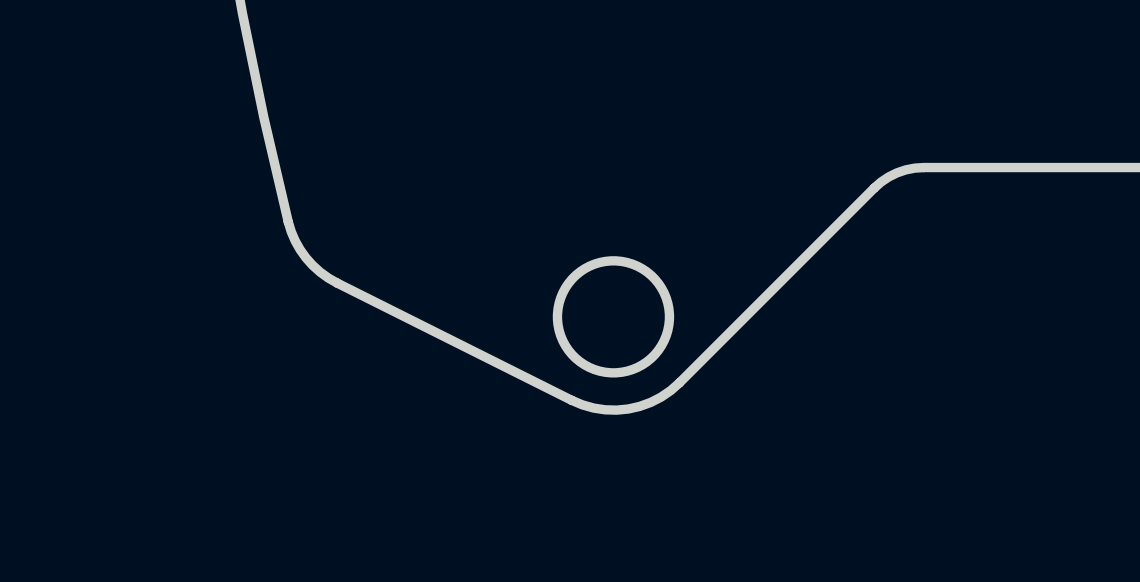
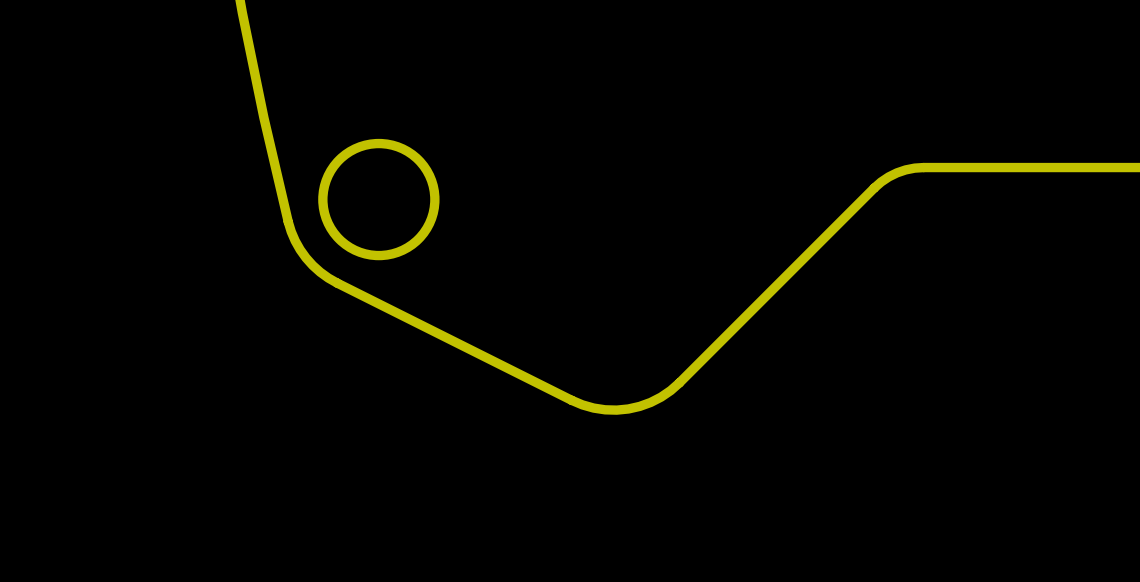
round board edge position: (613, 316) -> (378, 199)

